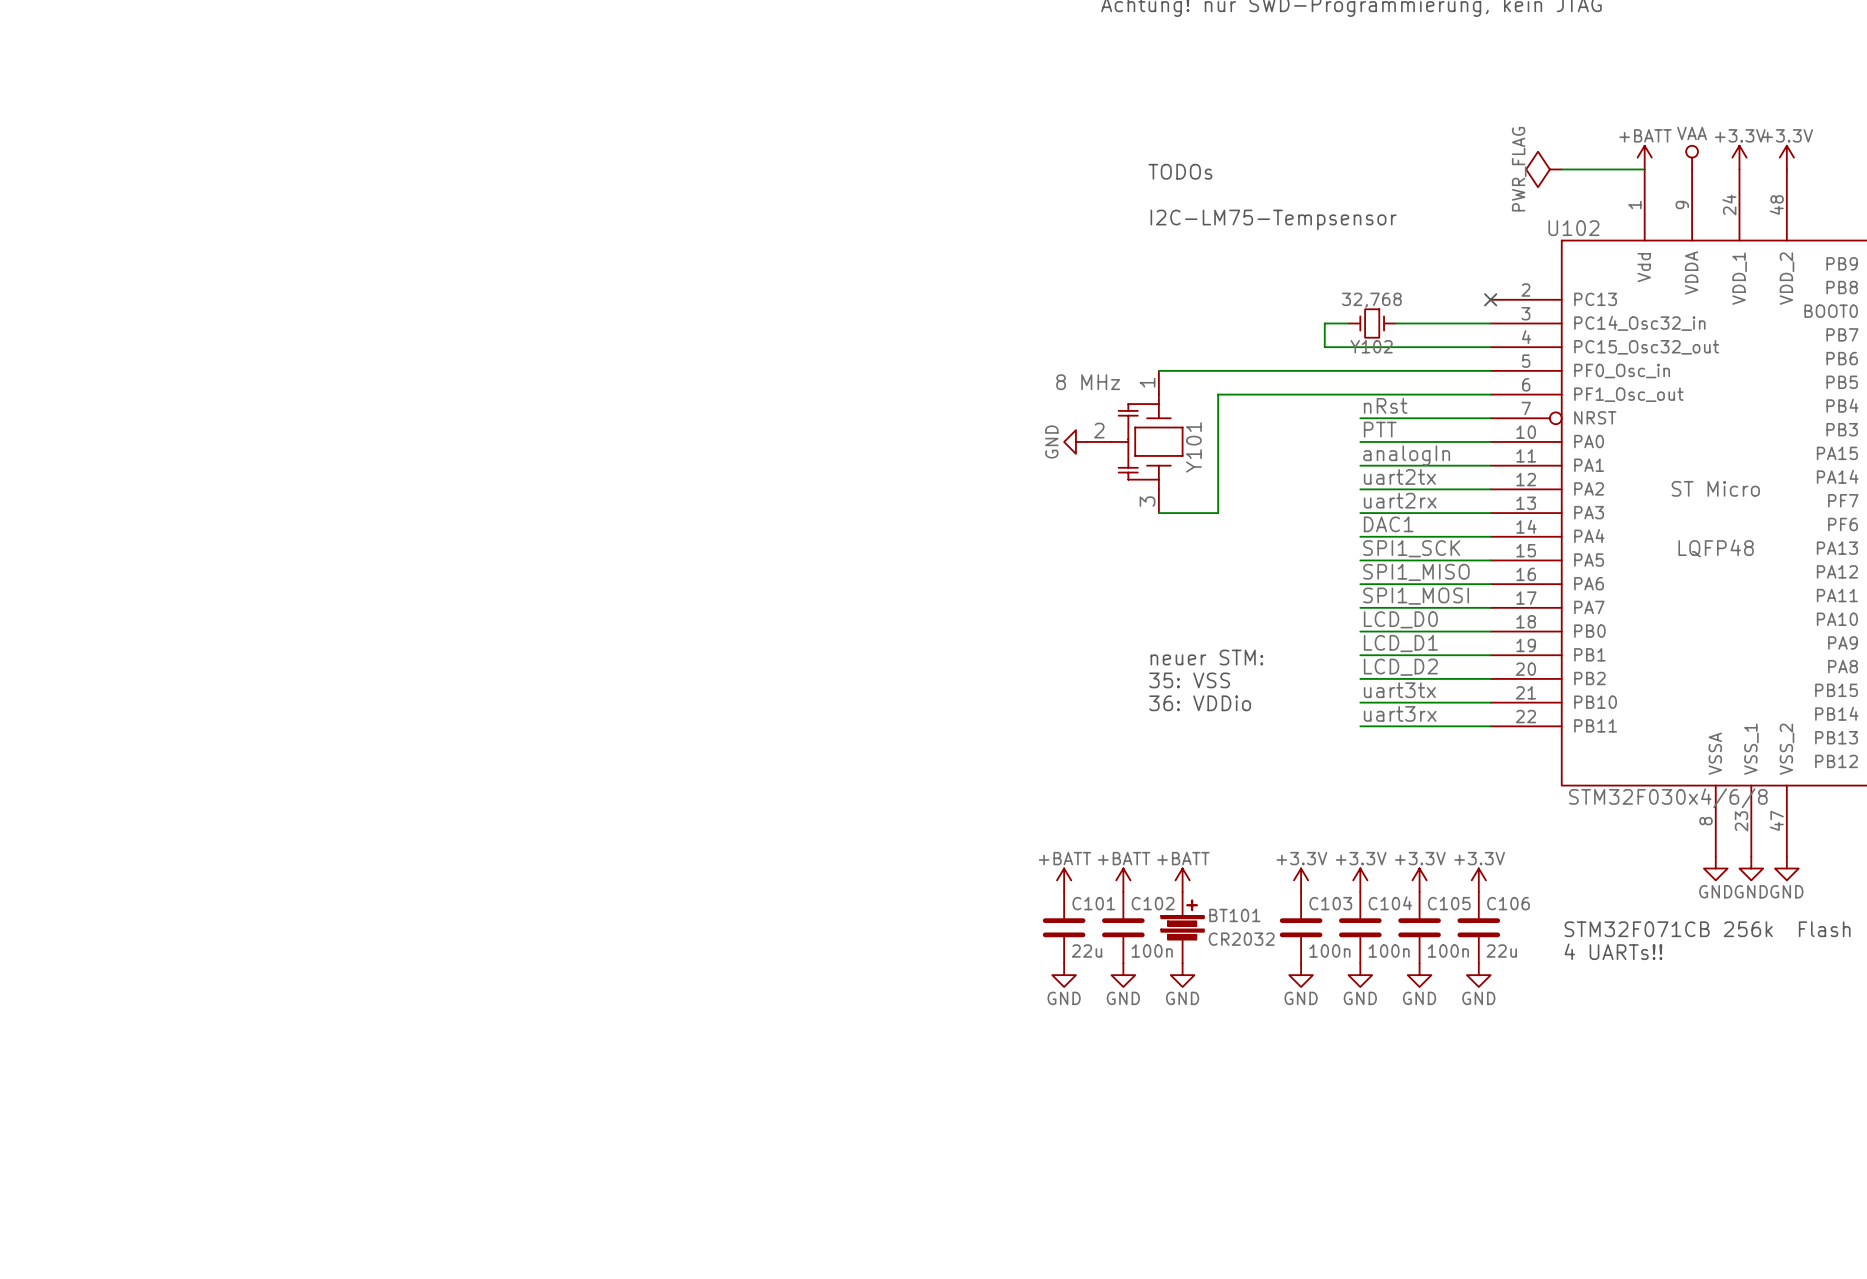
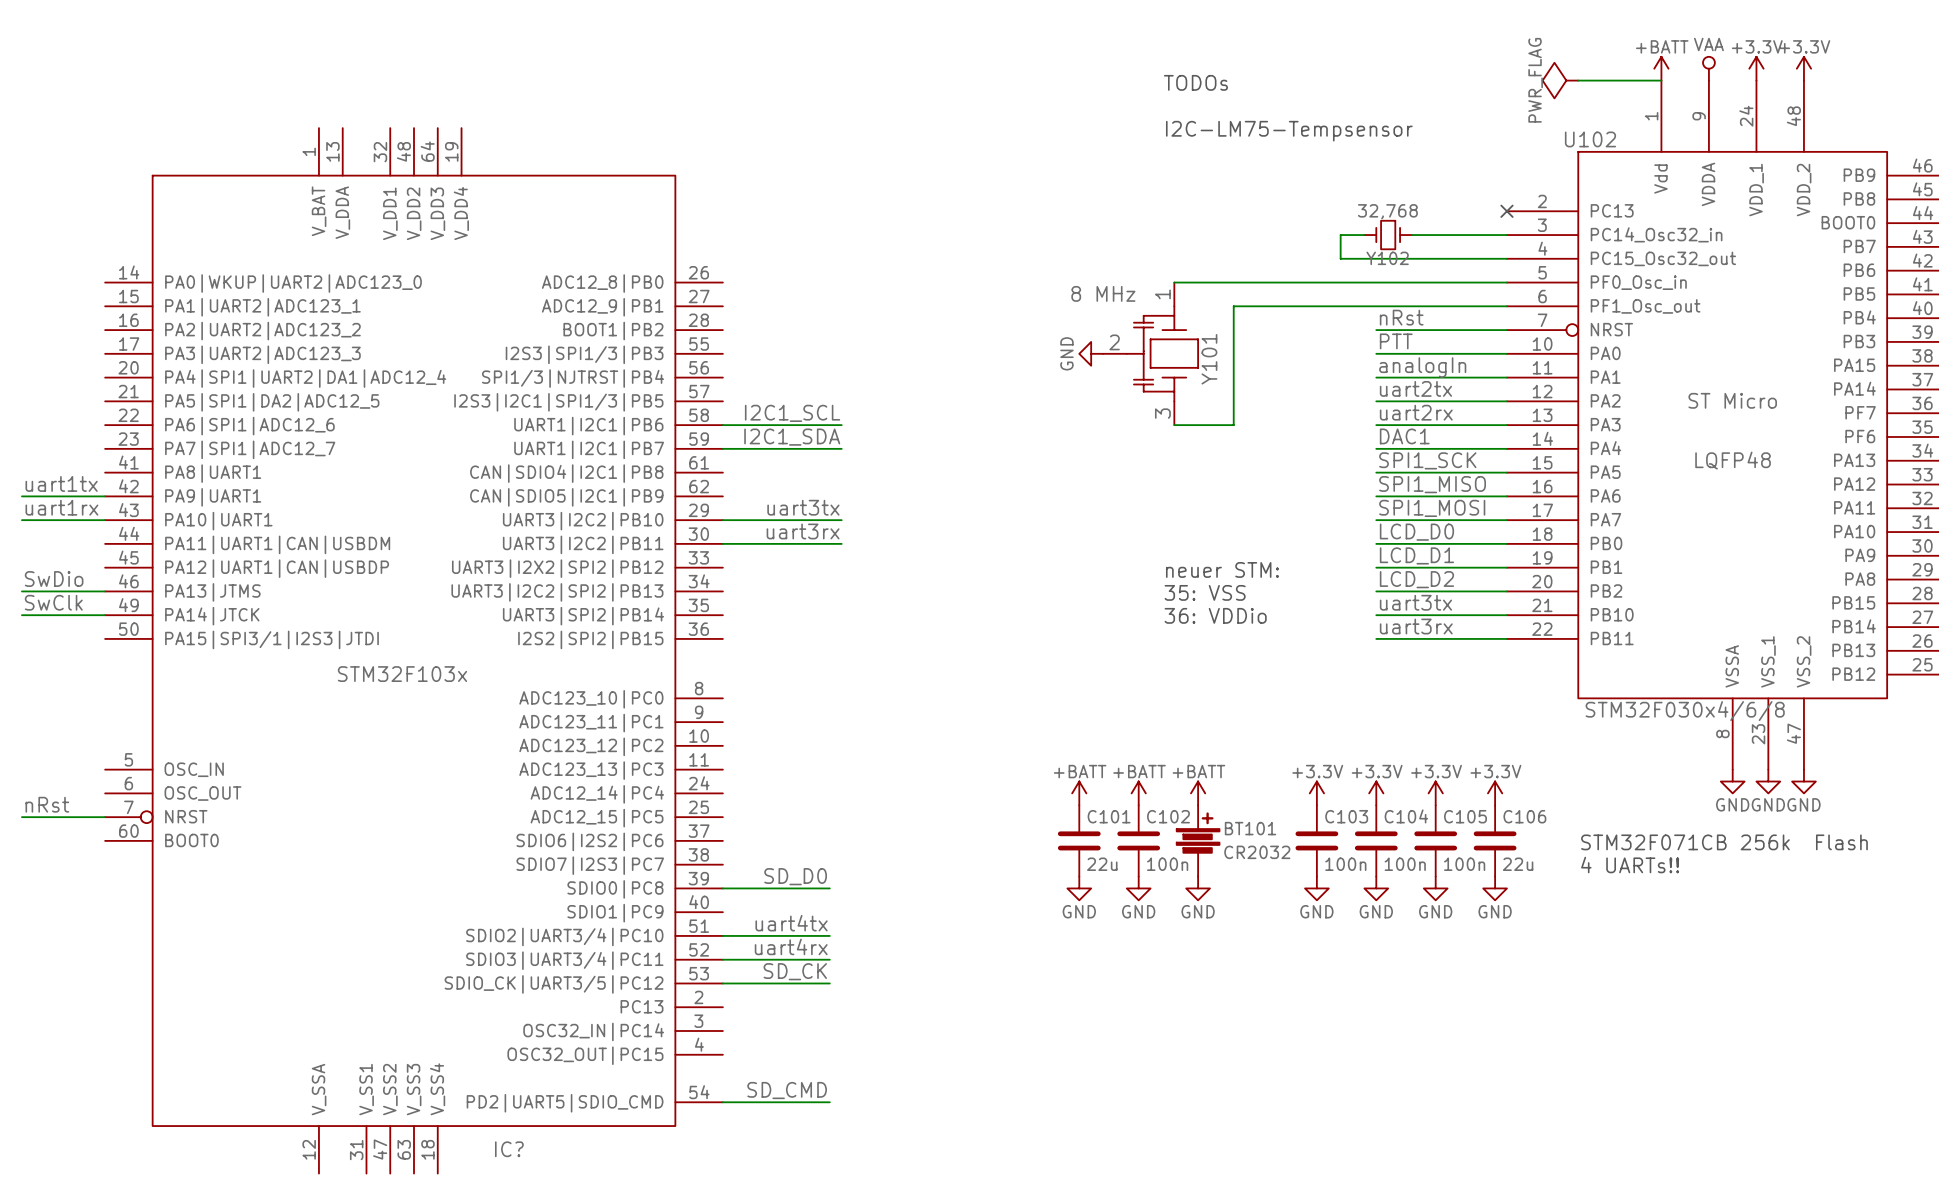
label: none -> I2C1_SCL (792, 413)
wire: none -> (722, 425) (841, 425)
label: none -> I2C1_SDA (792, 437)
wire: none -> (722, 448) (841, 448)
label: none -> uart1tx (61, 483)
wire: none -> (21, 496) (105, 496)
label: none -> uart1rx (61, 507)
label: none -> uart3tx (803, 507)
wire: none -> (21, 520) (105, 520)
wire: none -> (722, 520) (841, 520)
label: none -> uart3rx (803, 531)
wire: none -> (722, 543) (841, 543)
label: none -> SwDio (54, 579)
wire: none -> (21, 591) (105, 591)
label: none -> SwClk (53, 602)
wire: none -> (21, 615) (105, 615)
IC?: none -> STM32F103x (414, 650)
label: none -> nRst (47, 804)
wire: none -> (21, 817) (105, 817)
label: none -> SD_D0 (795, 876)
wire: none -> (722, 888) (829, 888)
label: none -> uart4tx (791, 923)
wire: none -> (722, 935) (829, 935)
label: none -> uart4rx (791, 946)
wire: none -> (722, 959) (829, 959)
label: none -> SD_CK (795, 971)
wire: none -> (722, 983) (829, 983)
label: none -> SD_CMD (787, 1090)
wire: none -> (722, 1102) (829, 1102)

